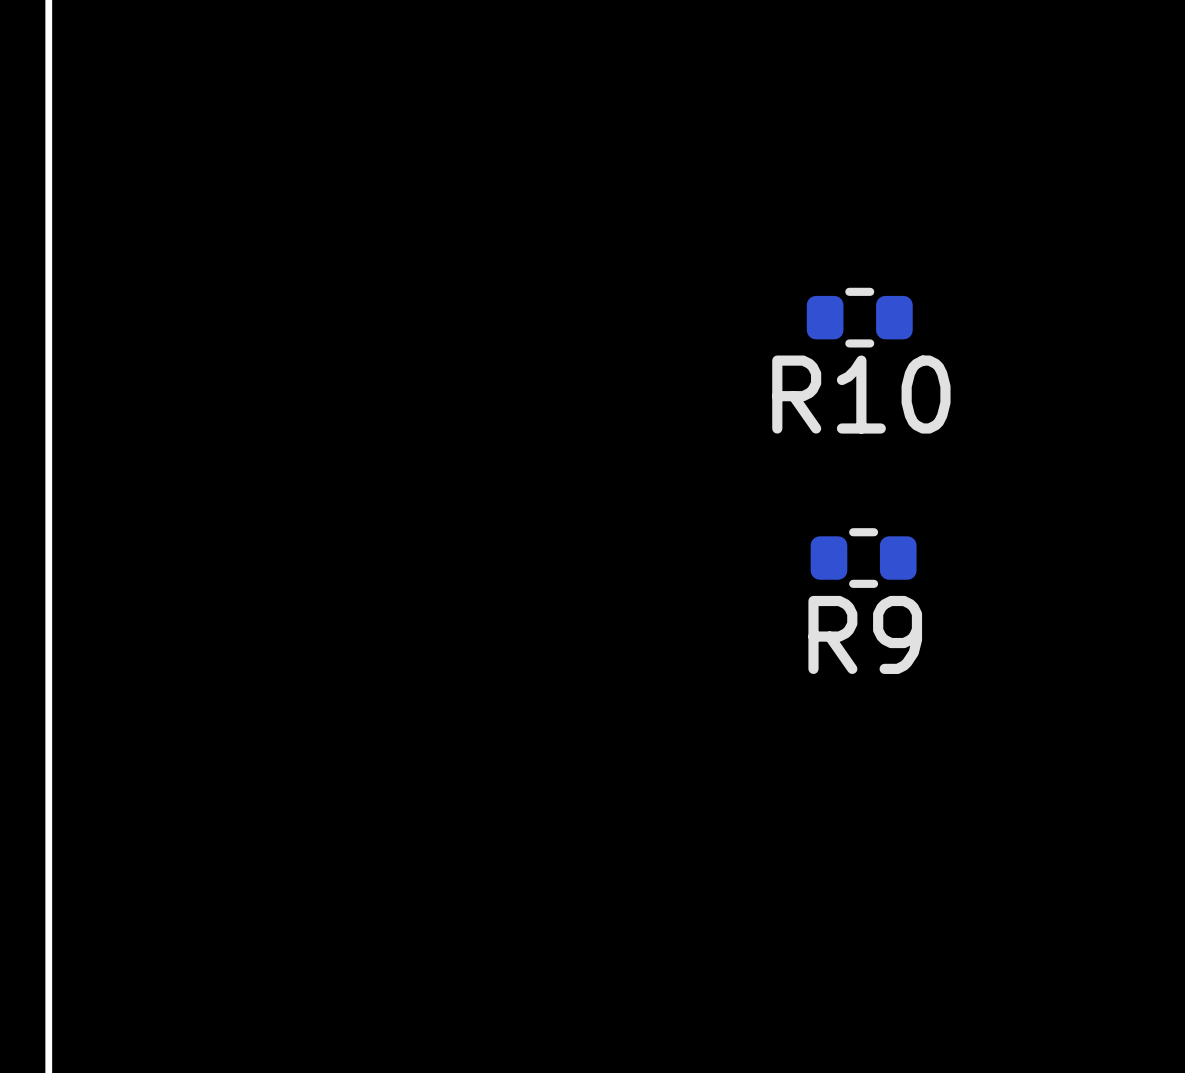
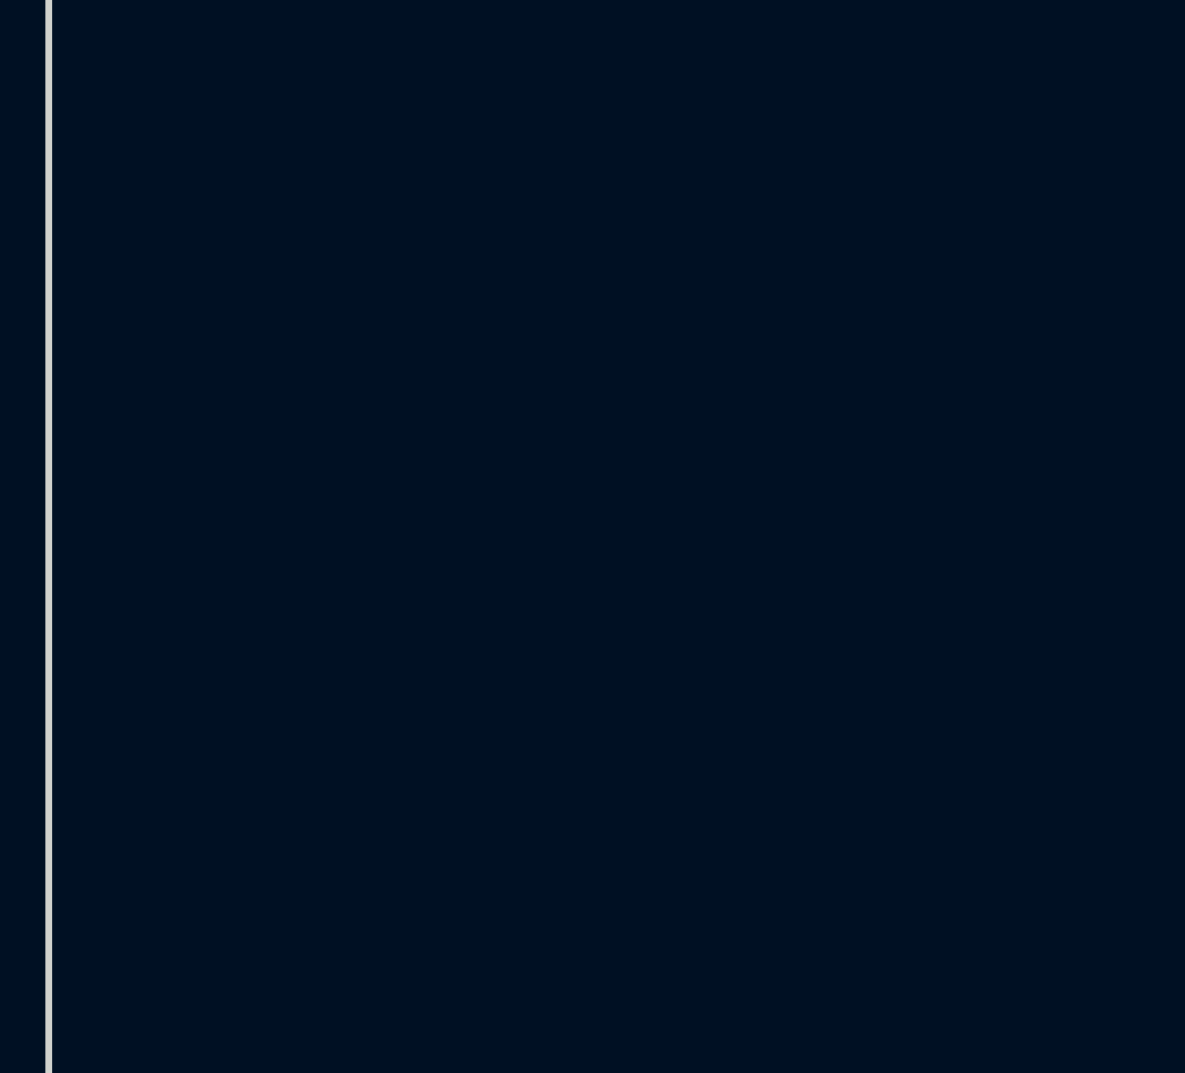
R10: (859, 317) -> none
R9: (863, 558) -> none

